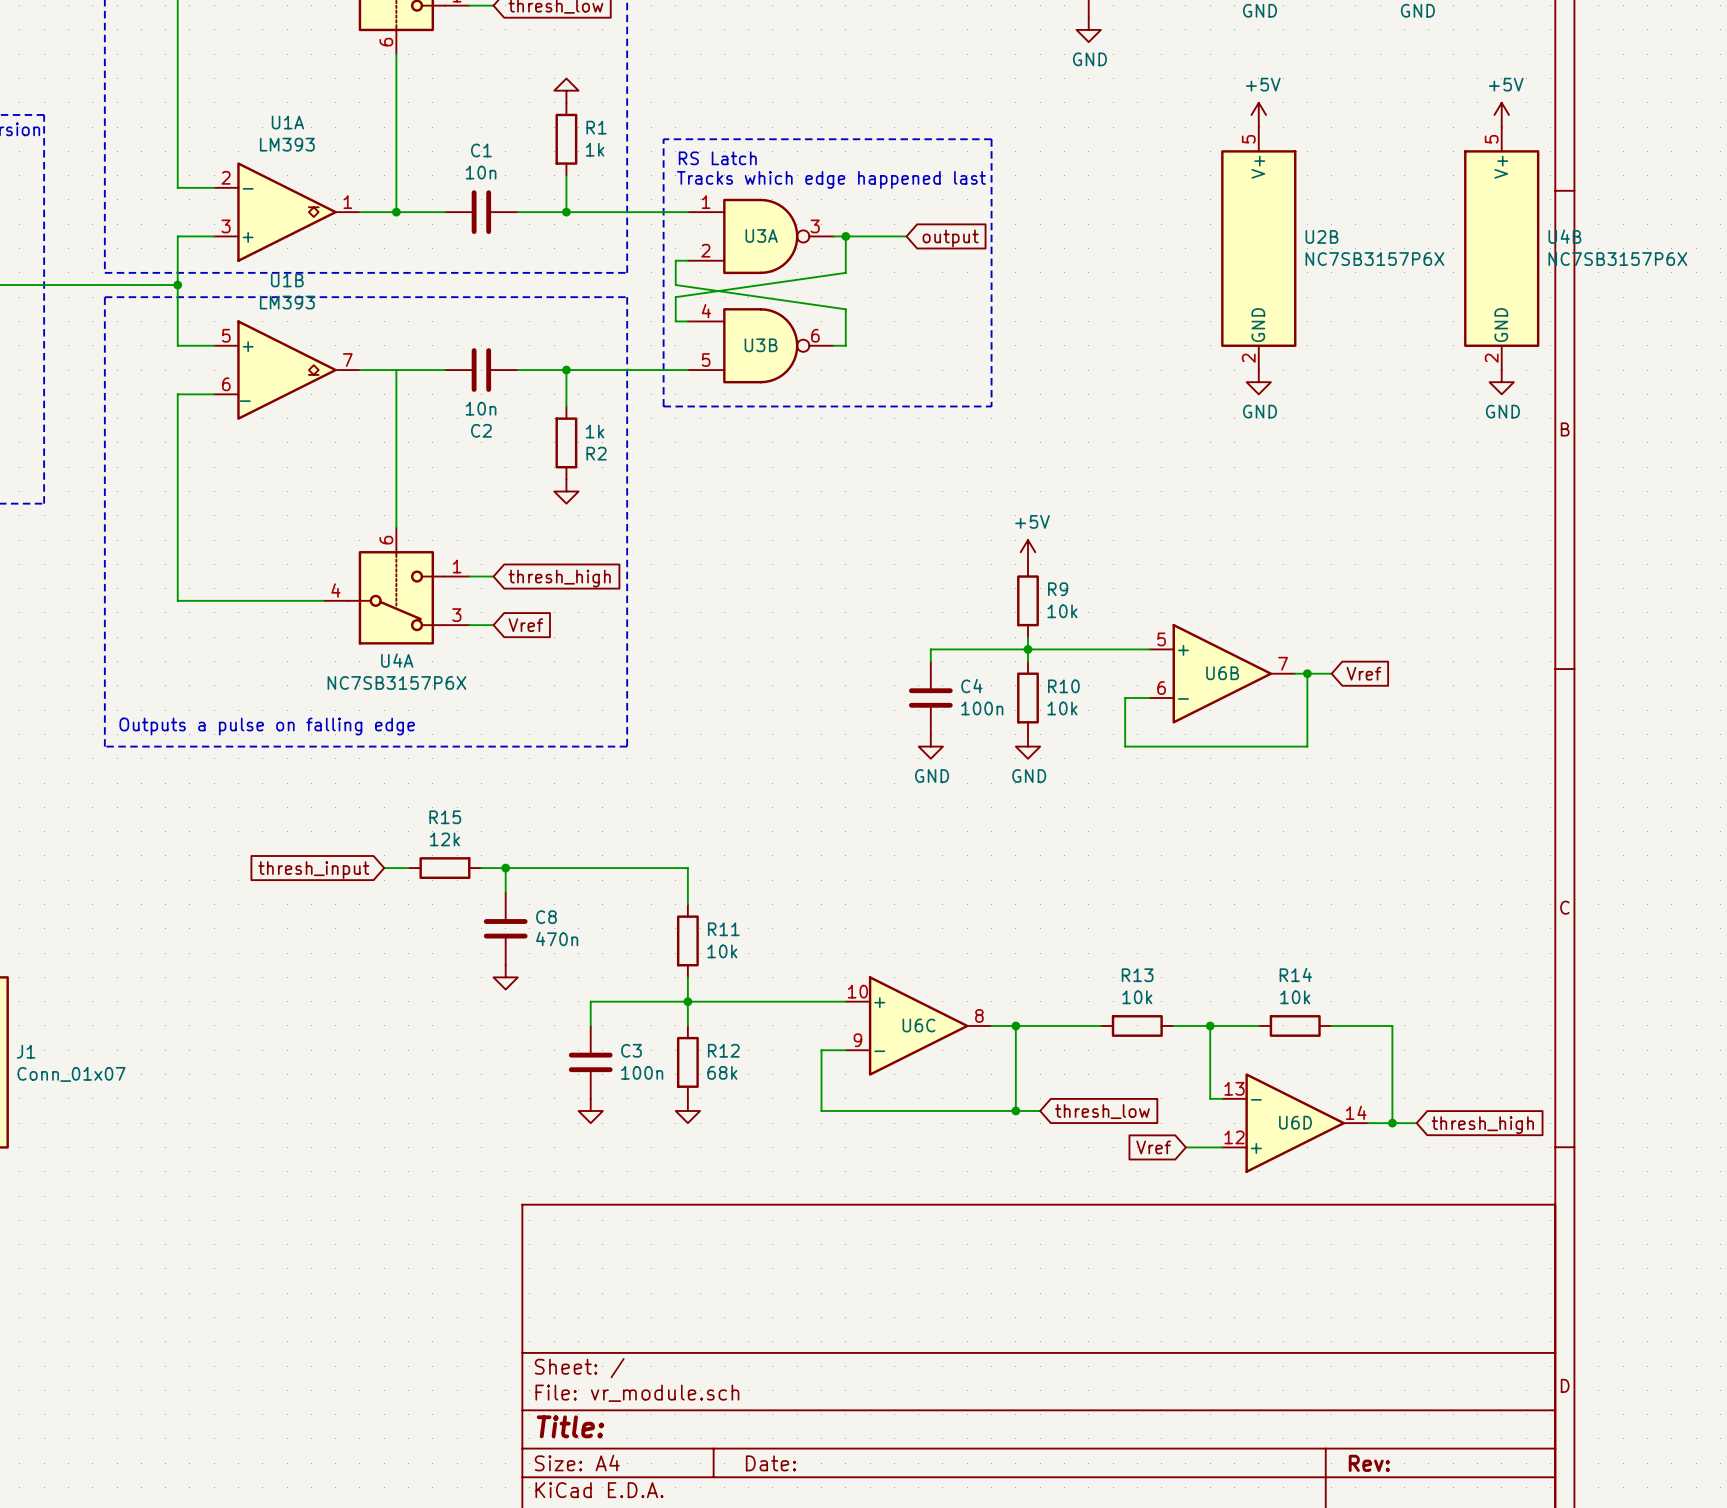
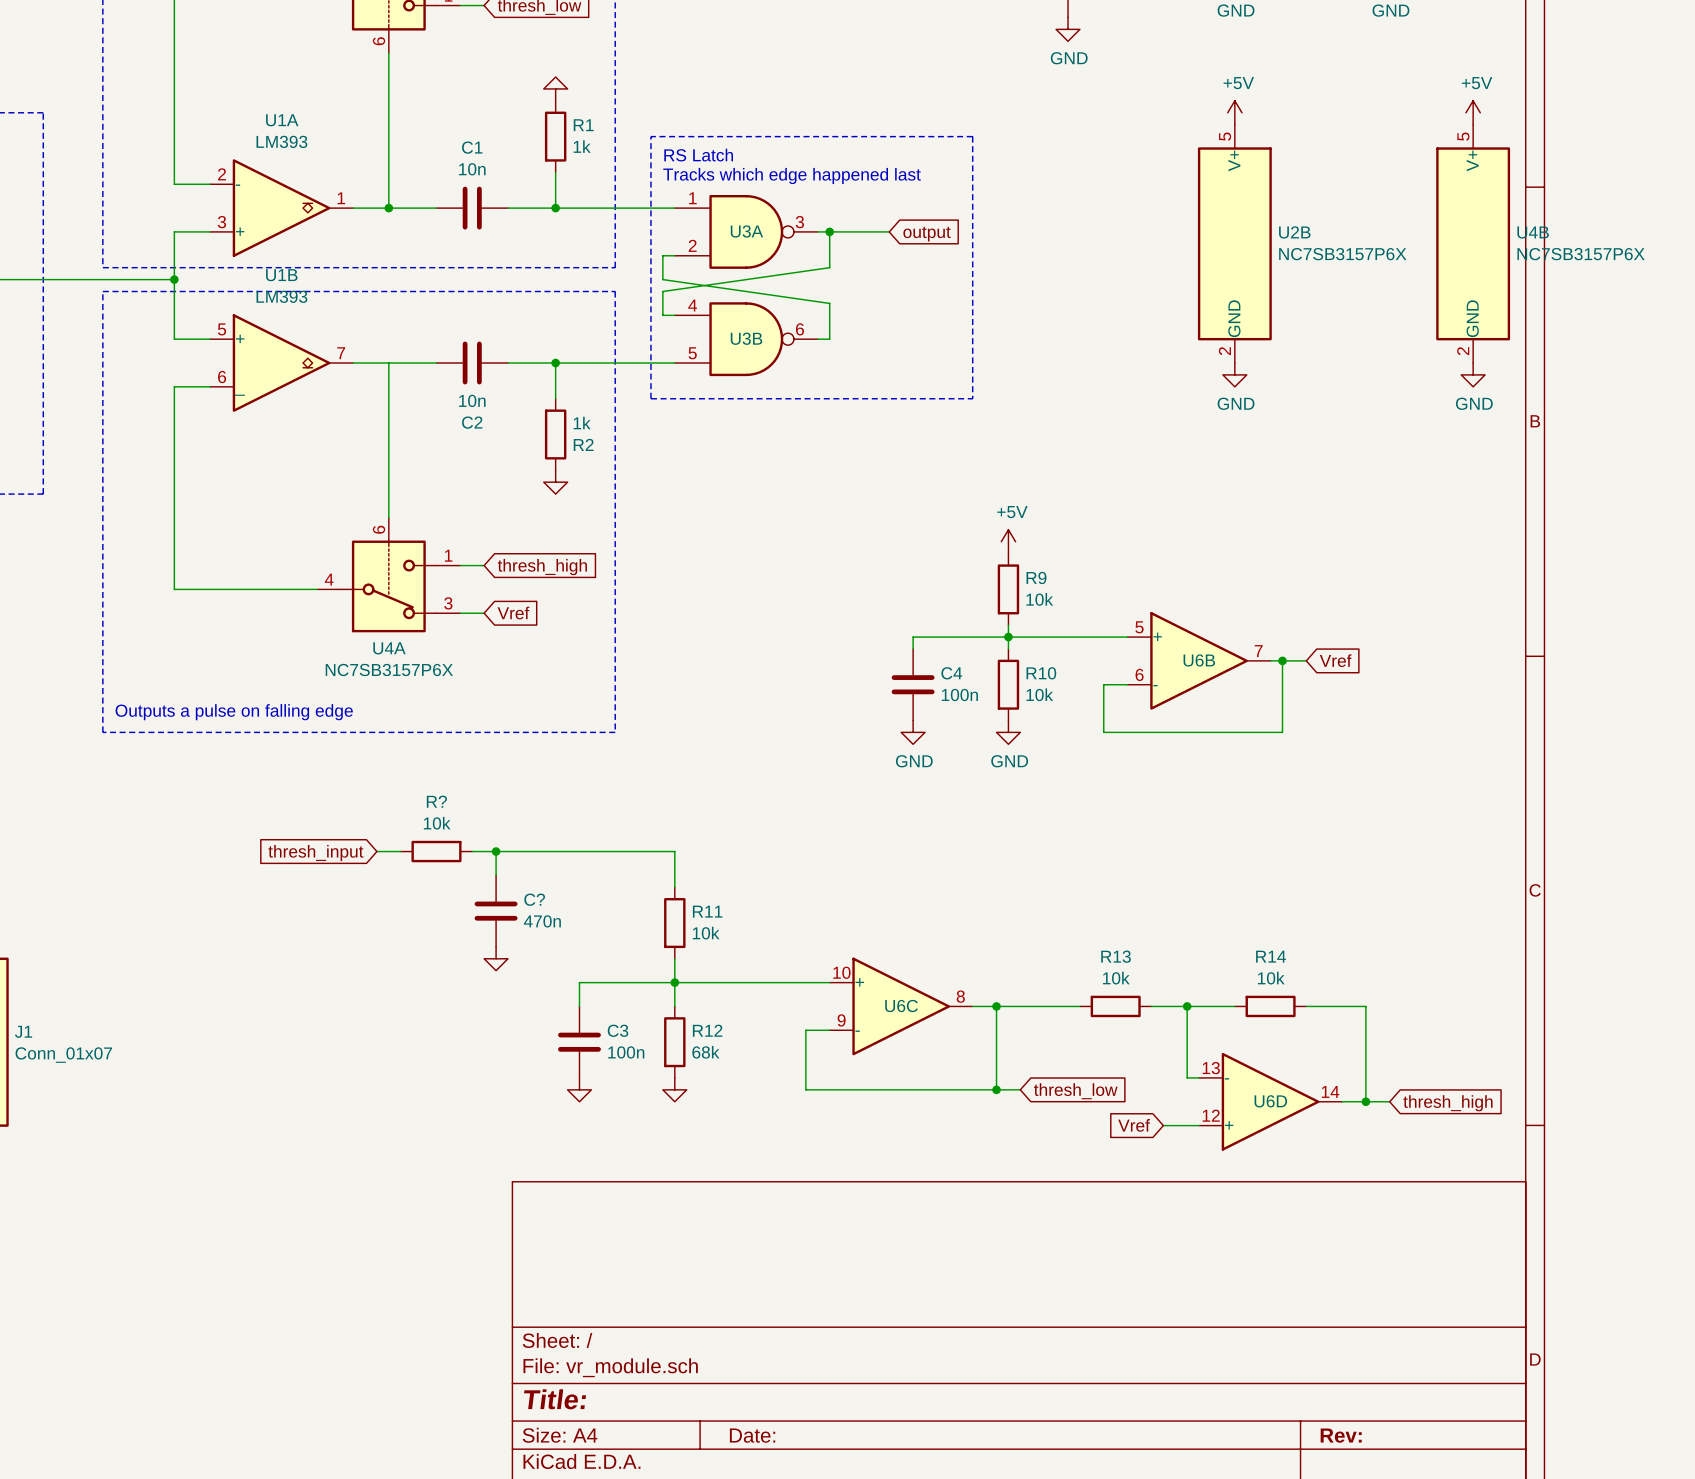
R15 name: R15 (445, 817) -> R? (436, 801)
R15 value: 12k (444, 839) -> 10k (437, 823)
C8 name: C8 (546, 917) -> C? (534, 899)

